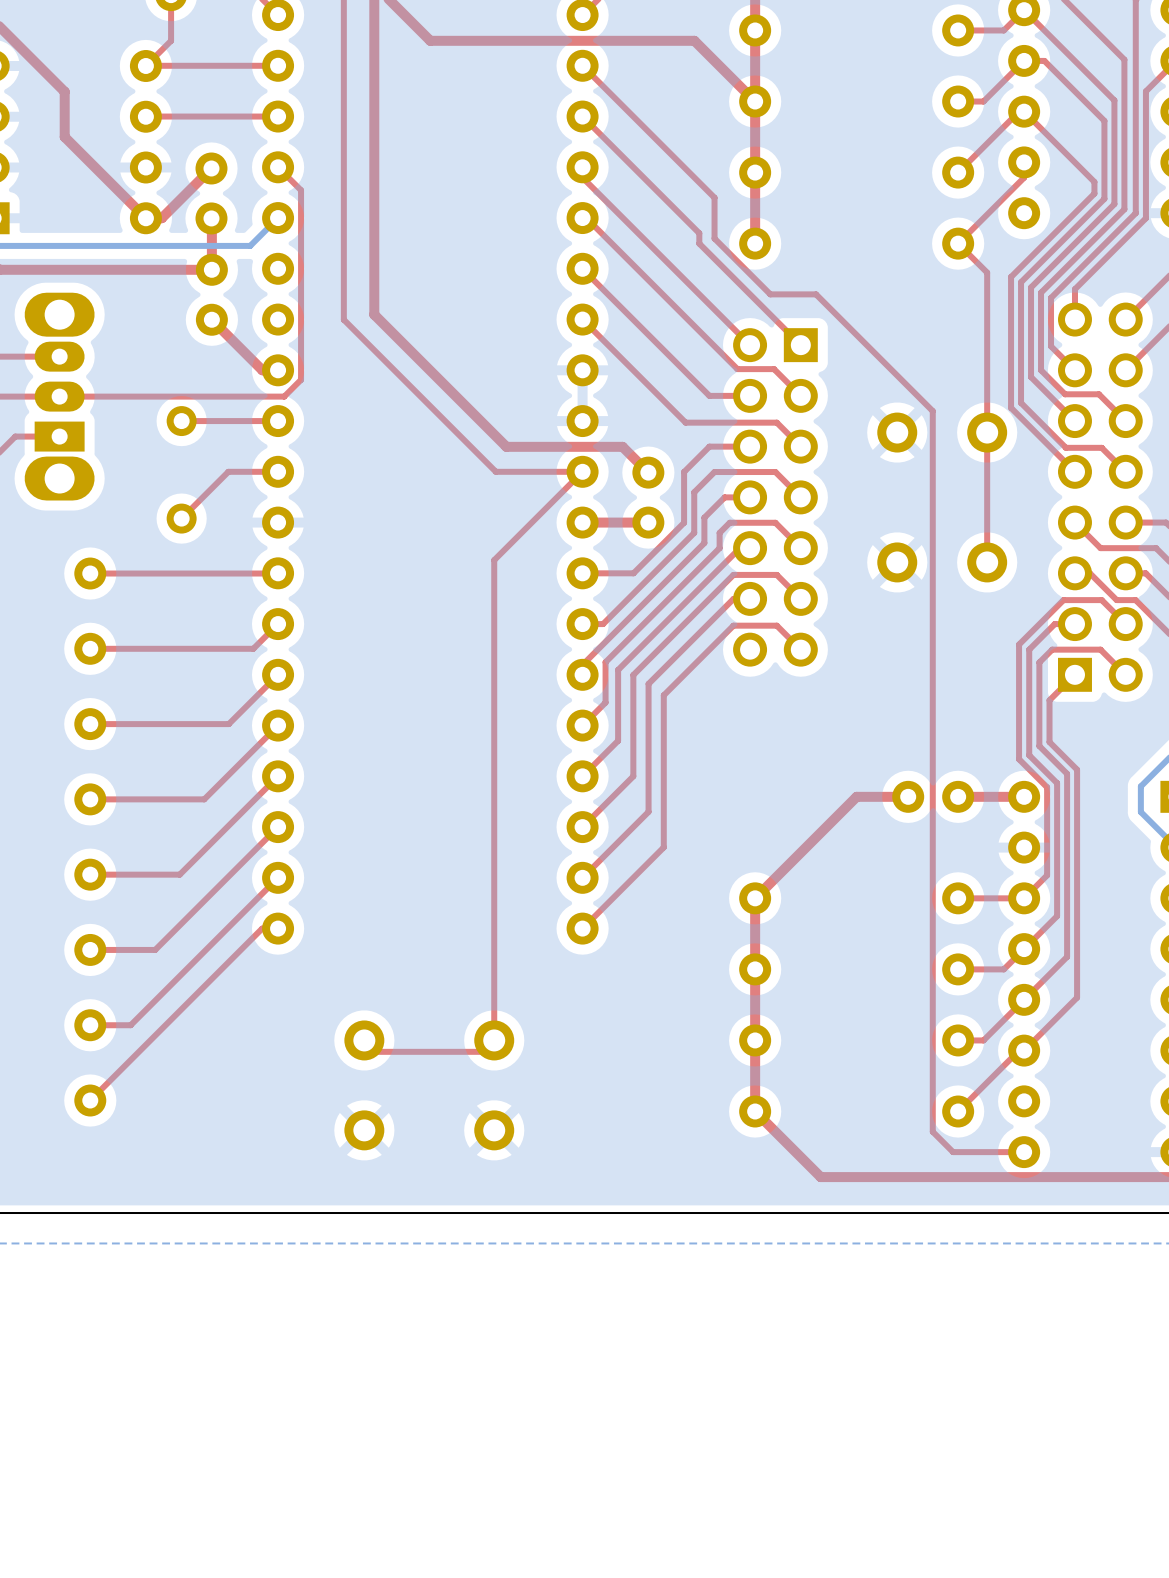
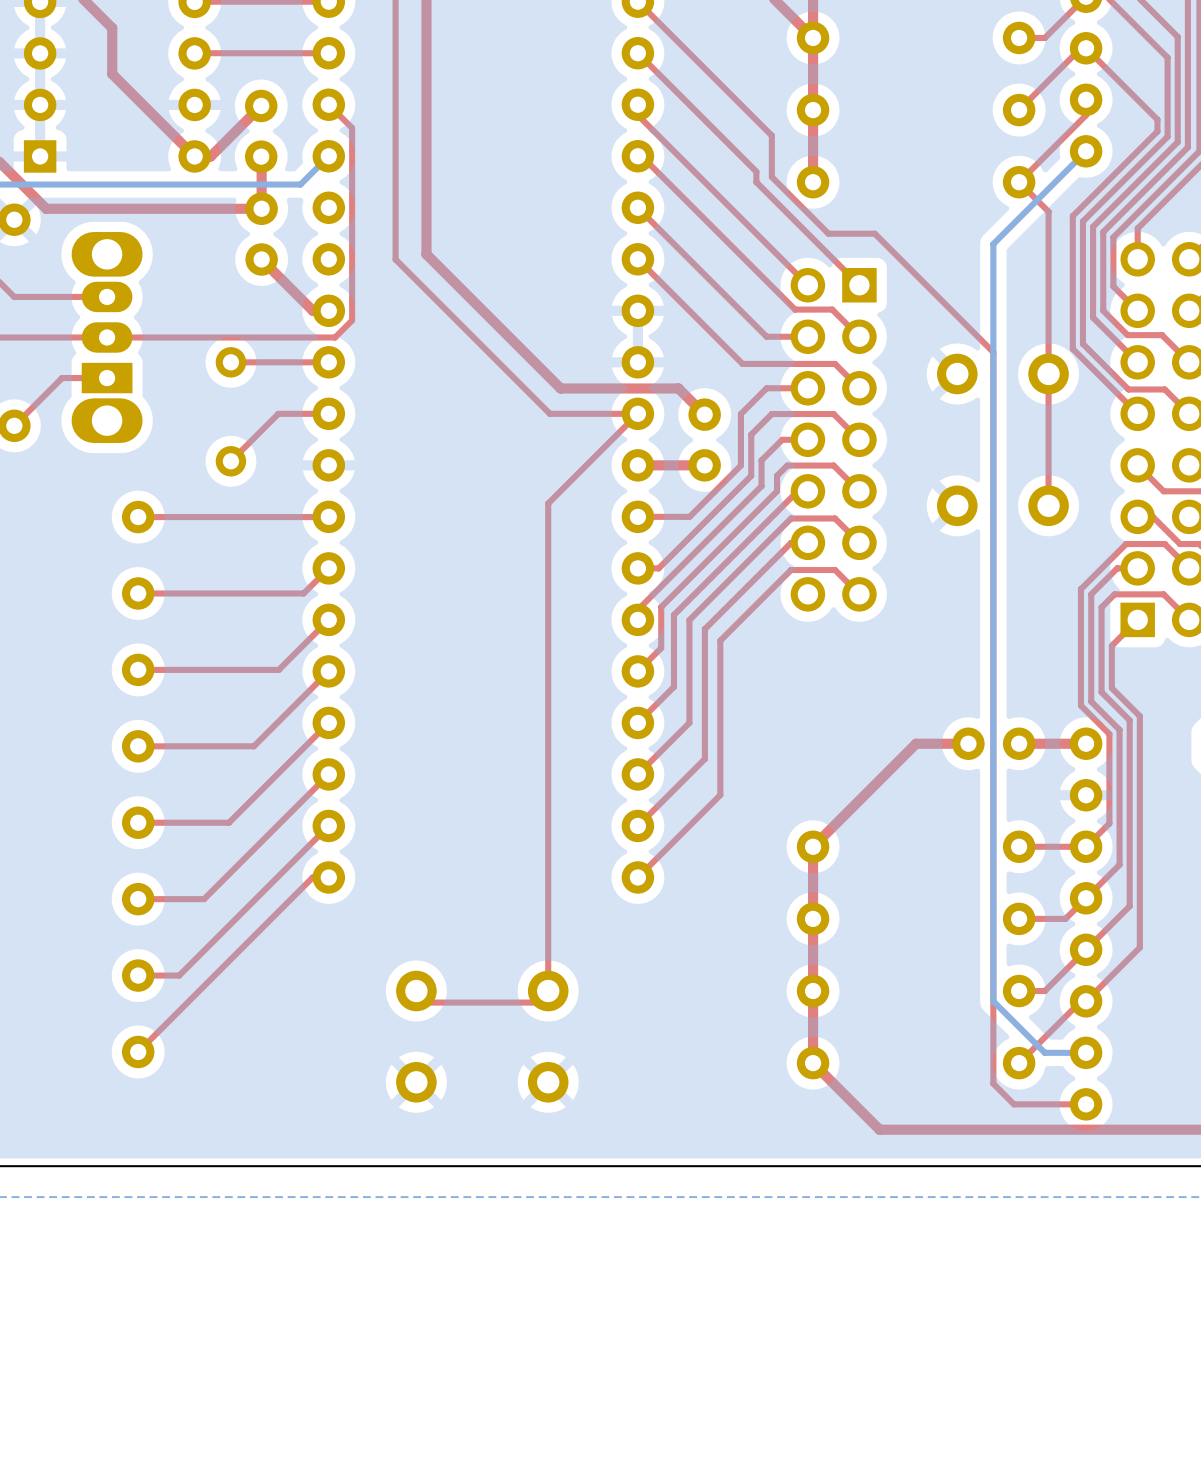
bottom track: none -> (1086, 151) (993, 244) (993, 1001) (1044, 1052) (1086, 1052)

